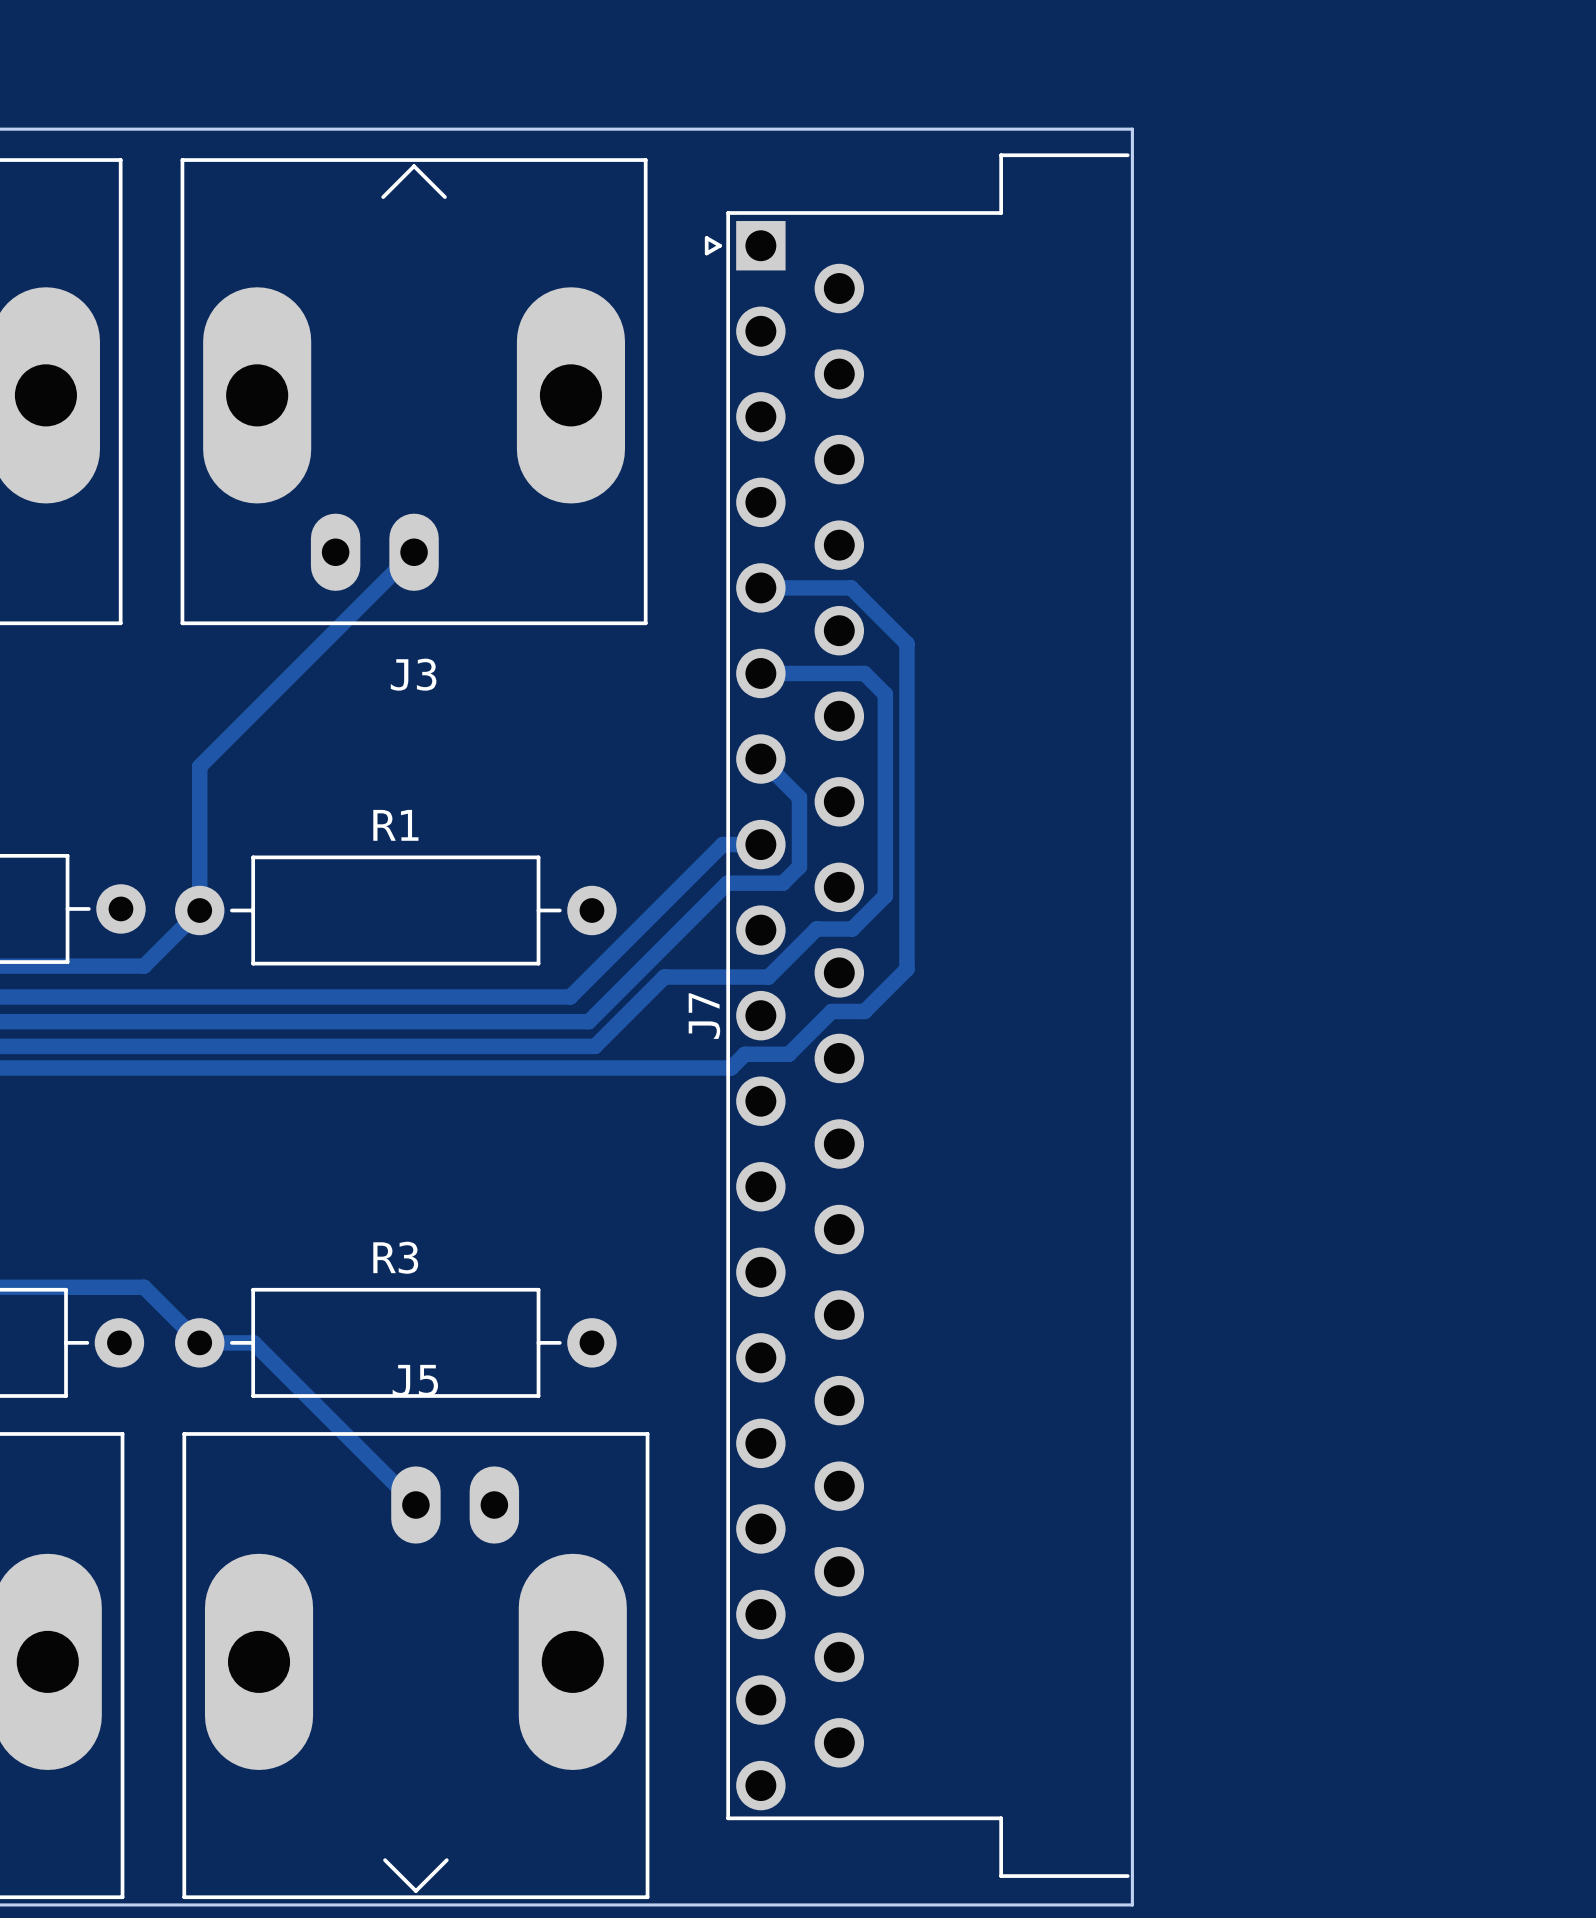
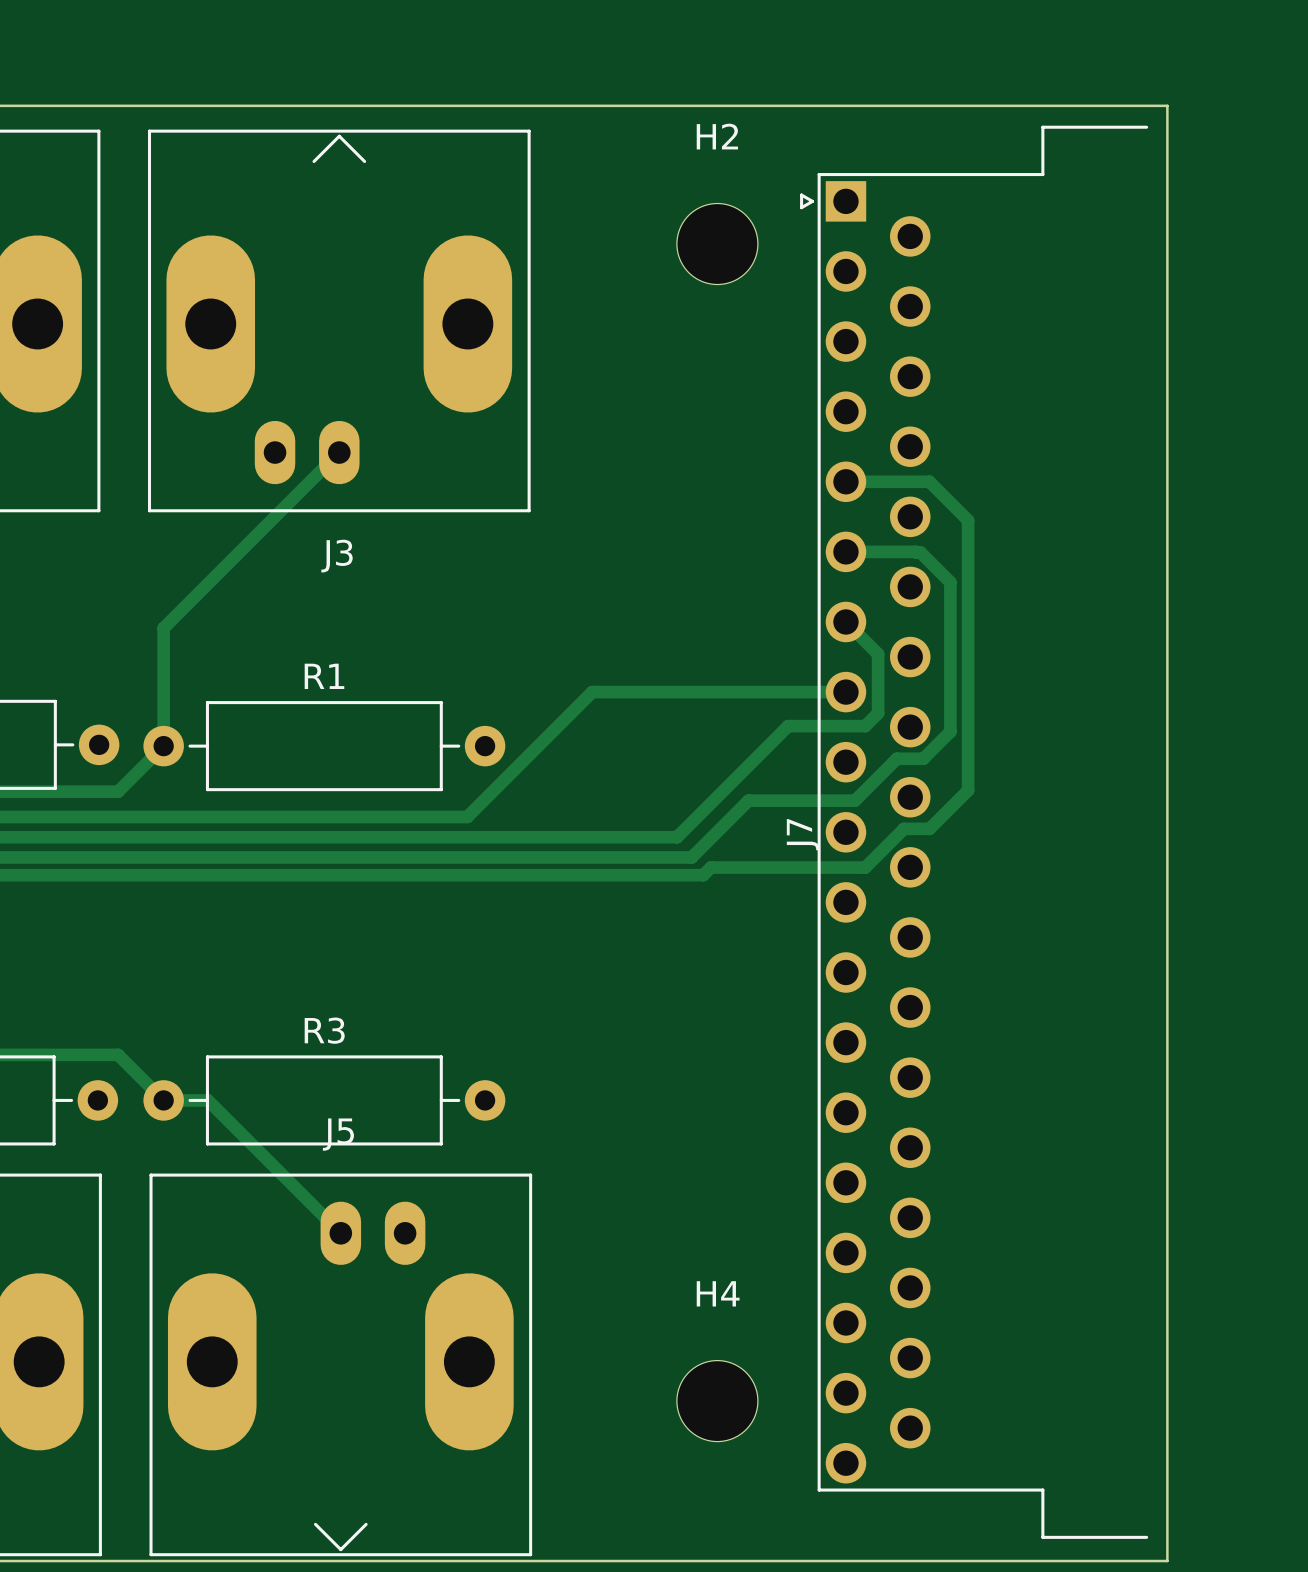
board edge: (1132, 129) (1132, 1904) -> (927, 105) (1167, 105) (1167, 1561) (927, 1561)
H2: none -> (717, 244)
track: (760, 587) (851, 587) (906, 643) (906, 969) (864, 1011) (831, 1011) (788, 1054) (744, 1054) (731, 1068) -> (845, 481) (929, 481) (968, 520) (968, 790) (929, 828) (903, 828) (865, 867) (710, 867) (703, 875) (599, 875)
track: (760, 673) (864, 673) (885, 694) (885, 895) (852, 929) (816, 929) (768, 977) (664, 977) (595, 1046) -> (845, 551) (920, 552) (950, 582) (950, 731) (923, 758) (896, 758) (855, 800) (748, 800) (691, 857) (487, 857)
track: (760, 759) (799, 797) (799, 866) (782, 883) (727, 883) (588, 1021) -> (845, 621) (878, 654) (878, 713) (865, 726) (788, 726) (677, 837) (482, 837)
track: none -> (623, 692) (845, 692)
J7 position: (917, 1015) -> (974, 832)
H4: none -> (717, 1401)

